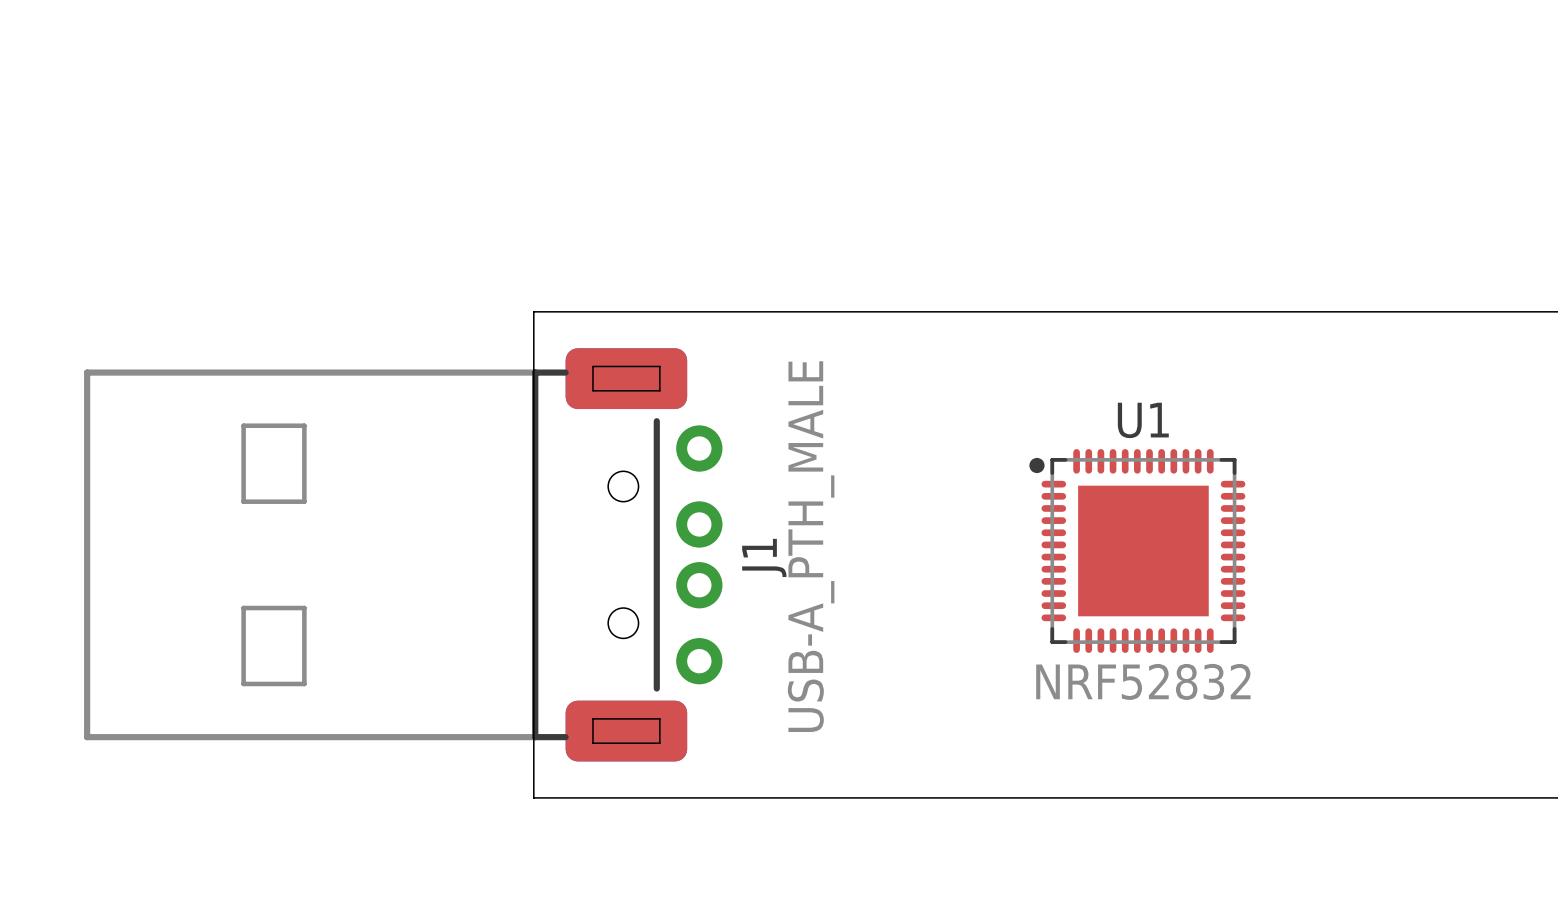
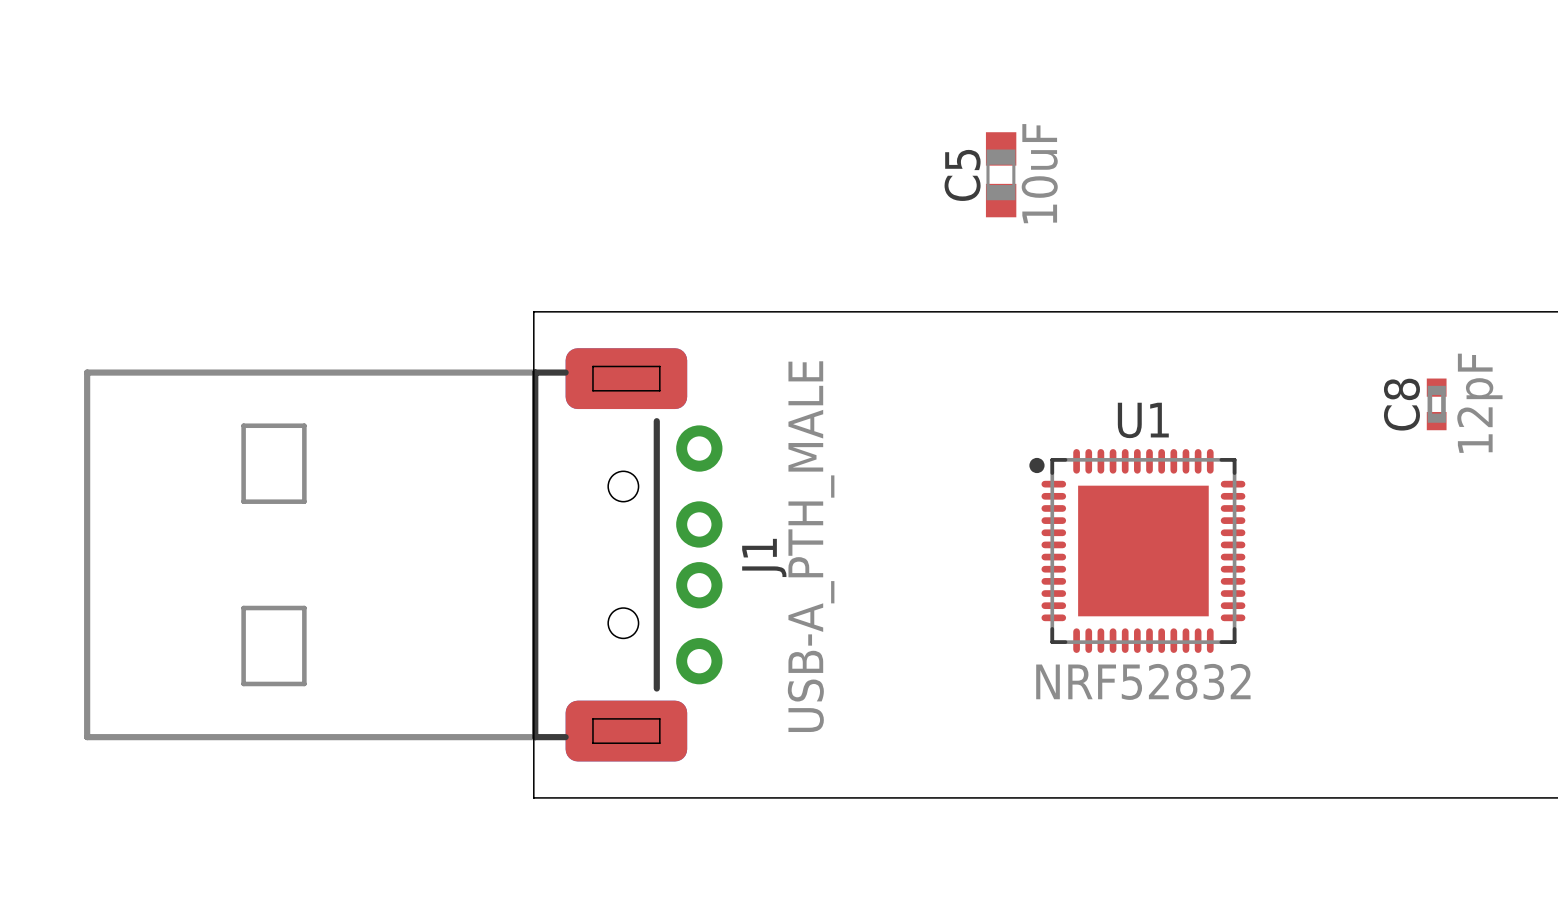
C5: none -> 10uF (1001, 174)
C8: none -> 12pF (1436, 404)

